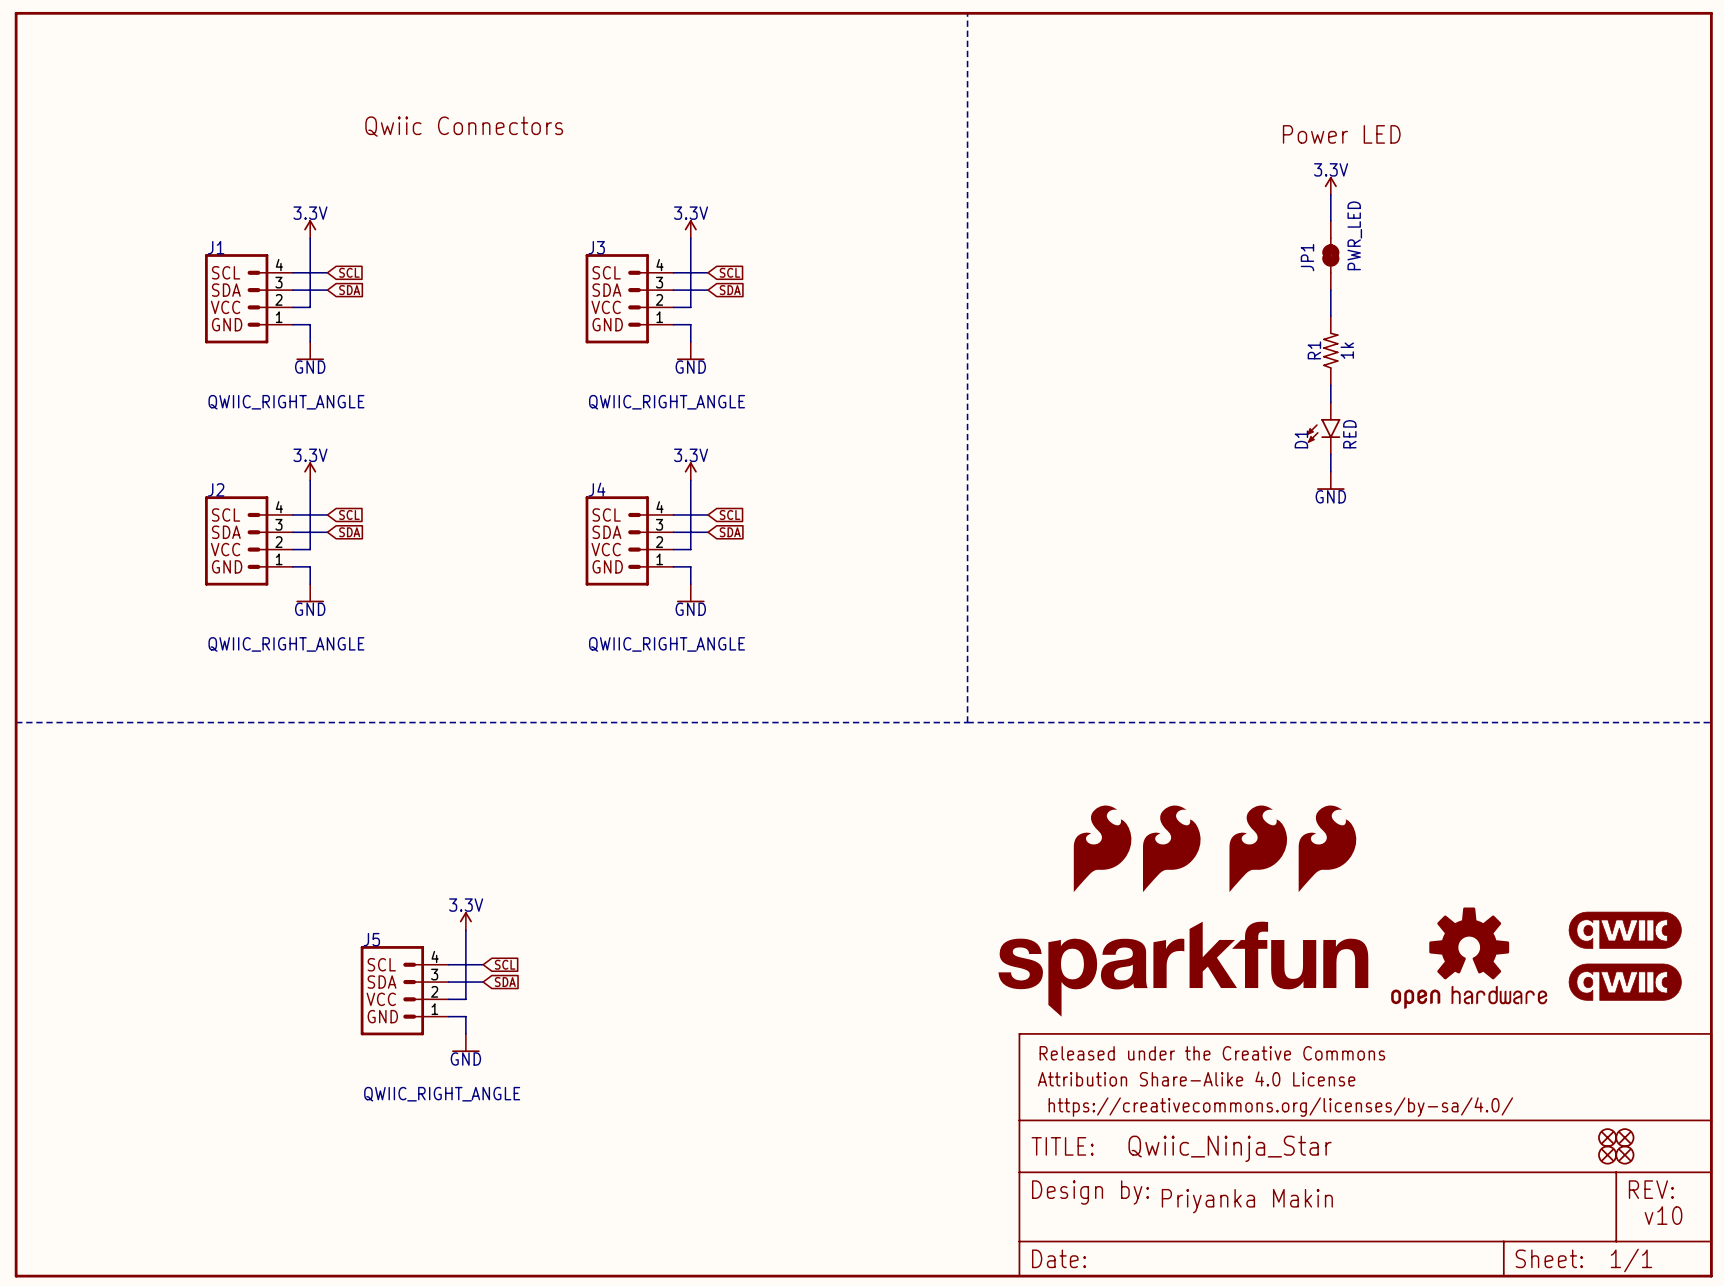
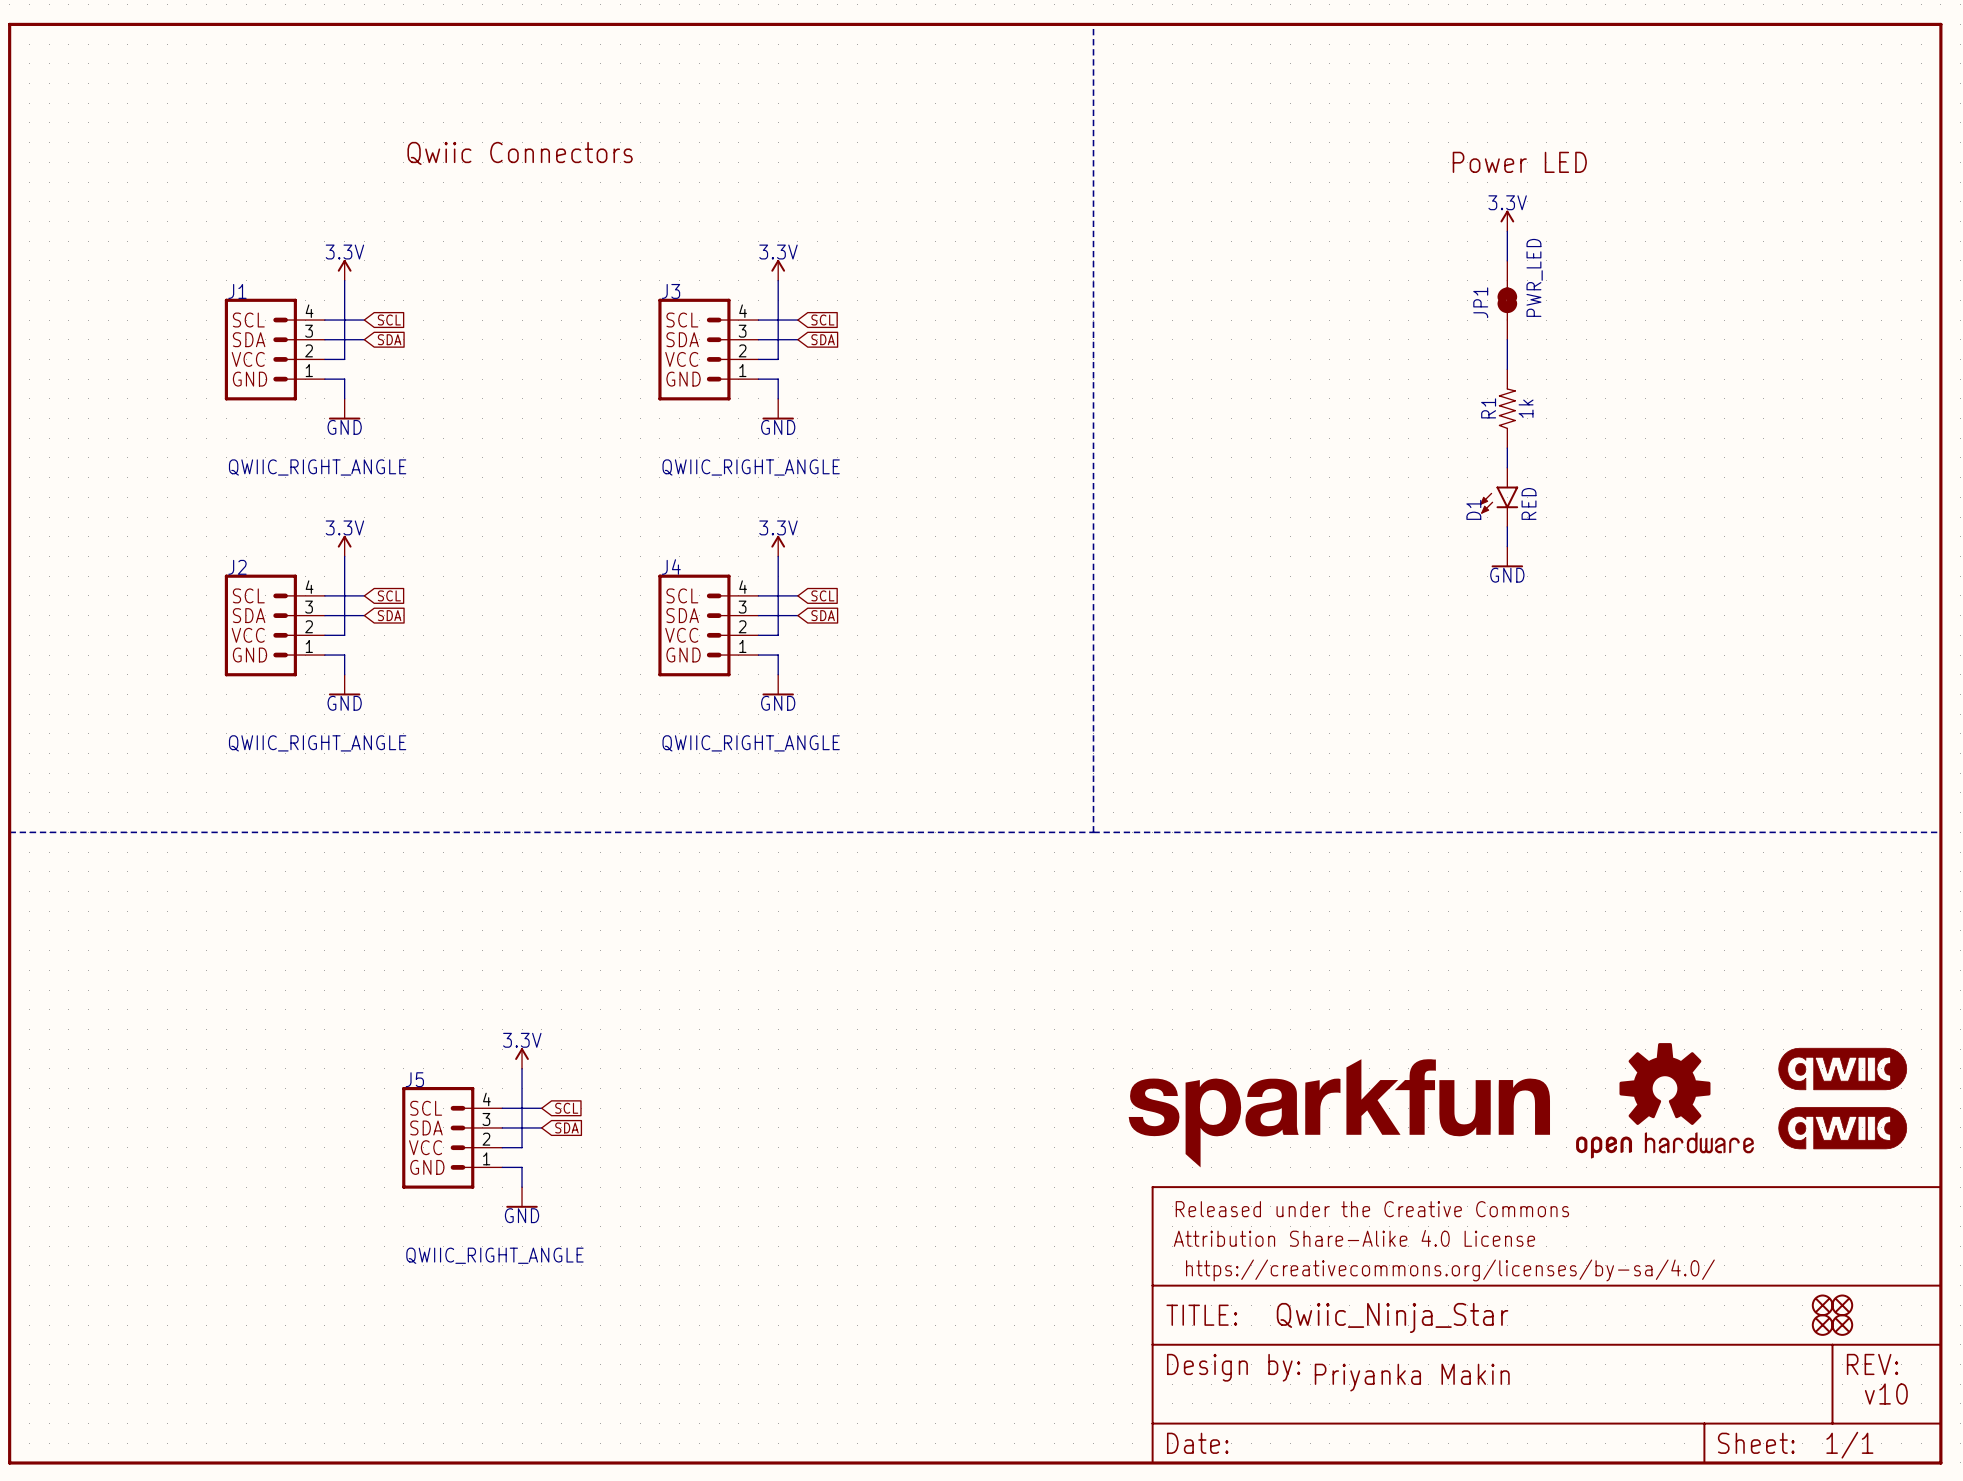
part: (1102, 848) -> none
part: (1171, 848) -> none
part: (1258, 848) -> none
part: (1327, 848) -> none

